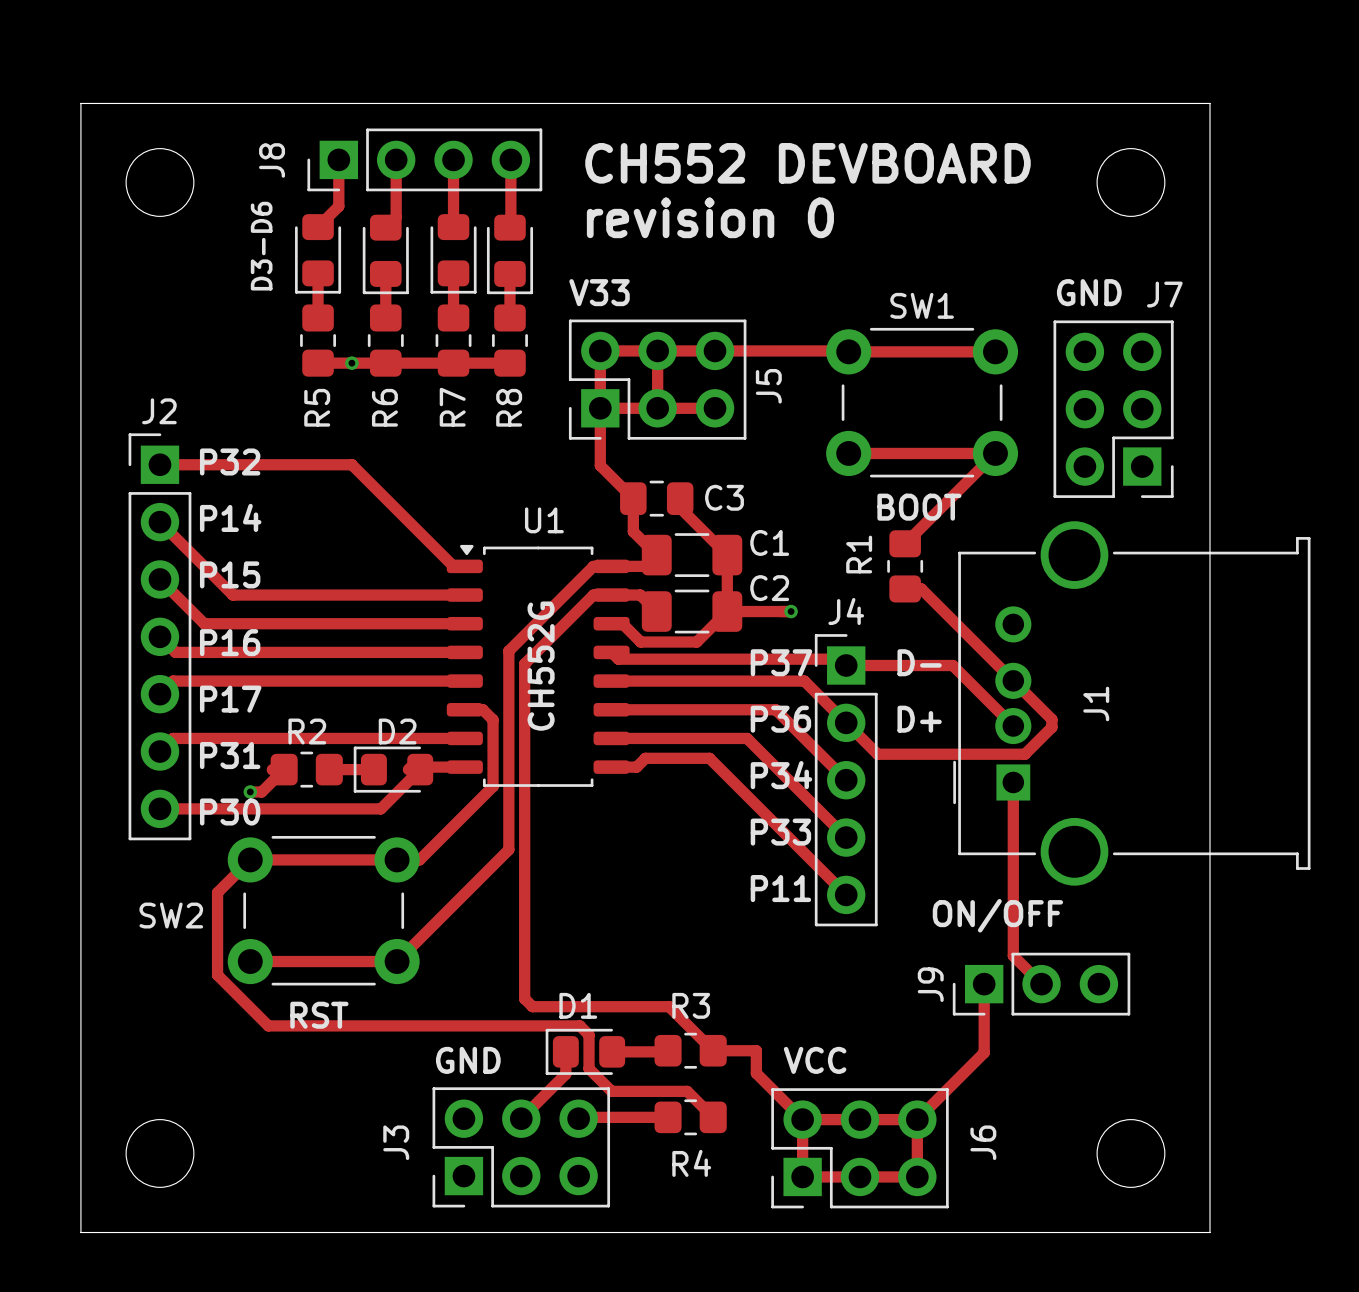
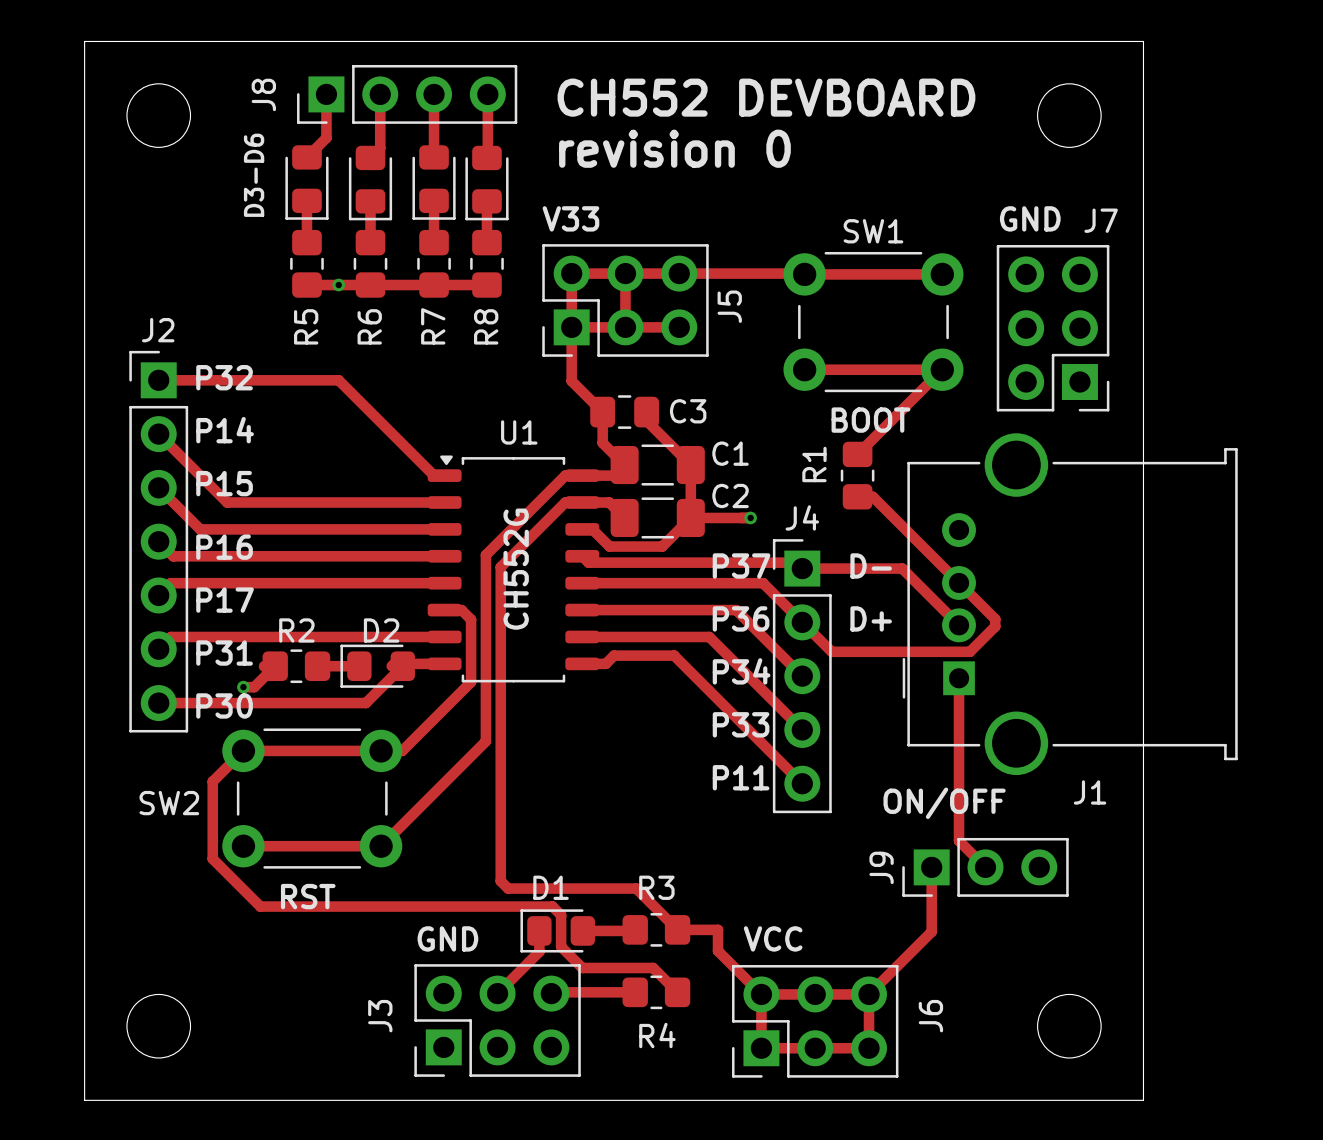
J1 name rotation: 0° (1096, 703) -> 90° clockwise (1090, 792)
J1 name position: J1 (1096, 703) -> J1 (1090, 792)

